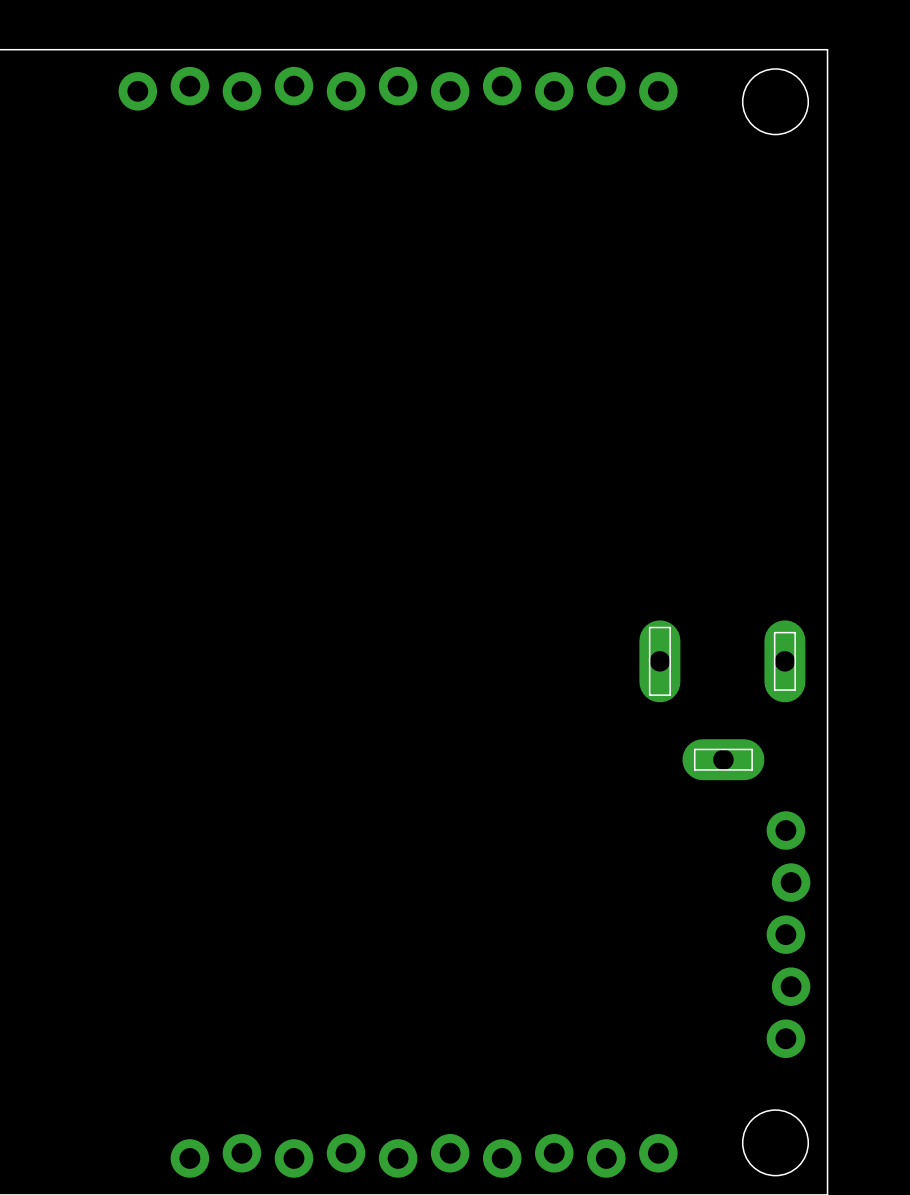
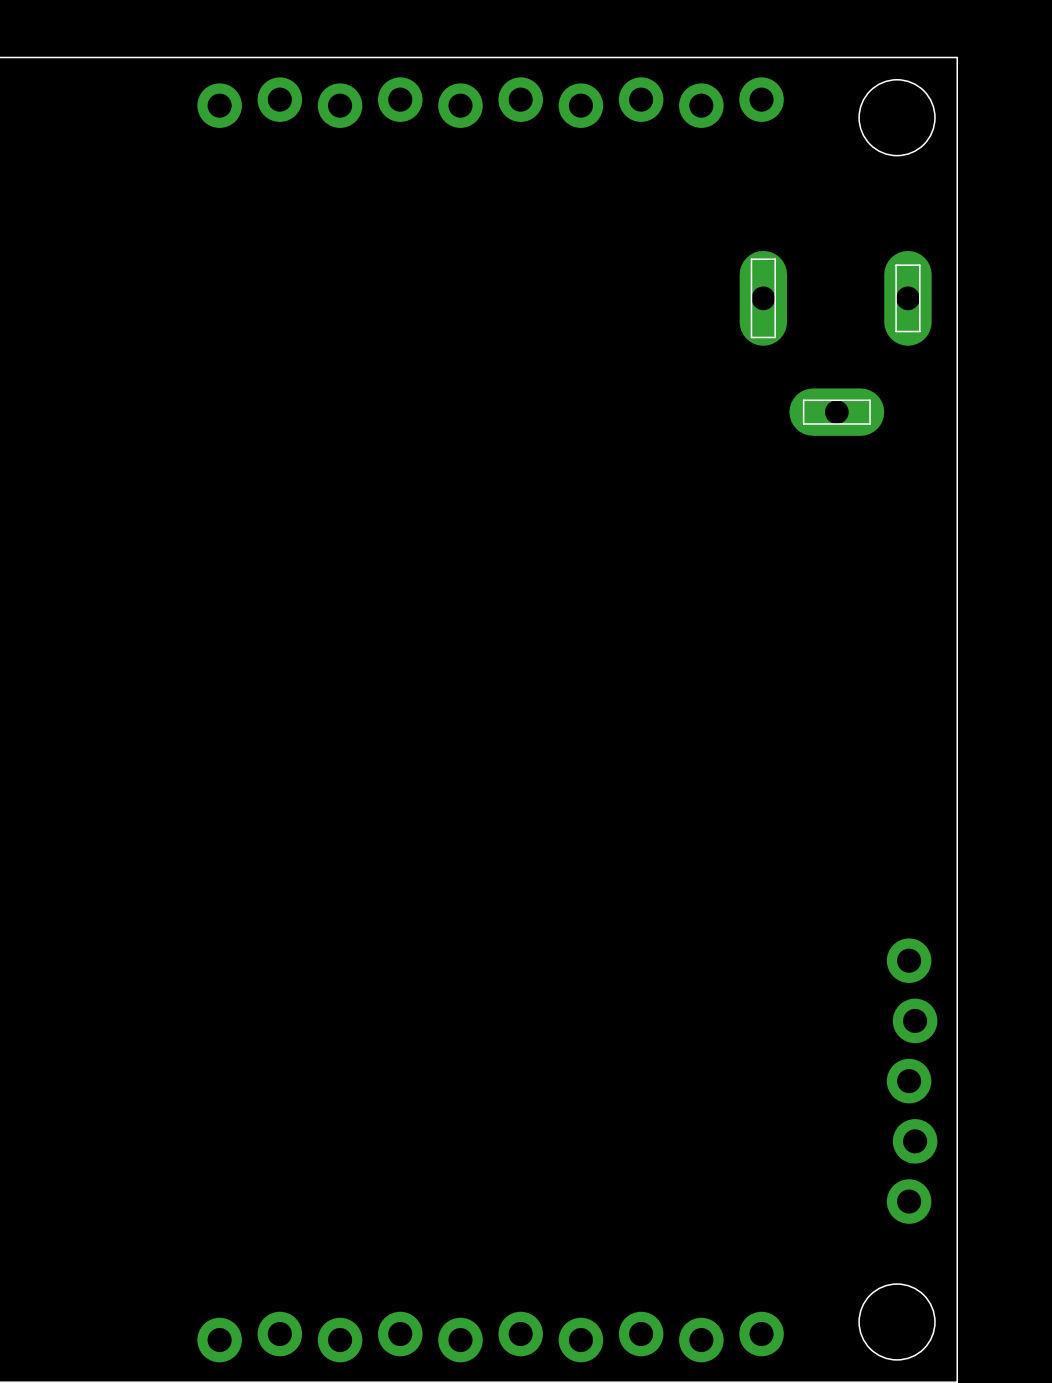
part: (398, 88) -> none
part: none -> (490, 102)
part position: (722, 700) -> (835, 343)

